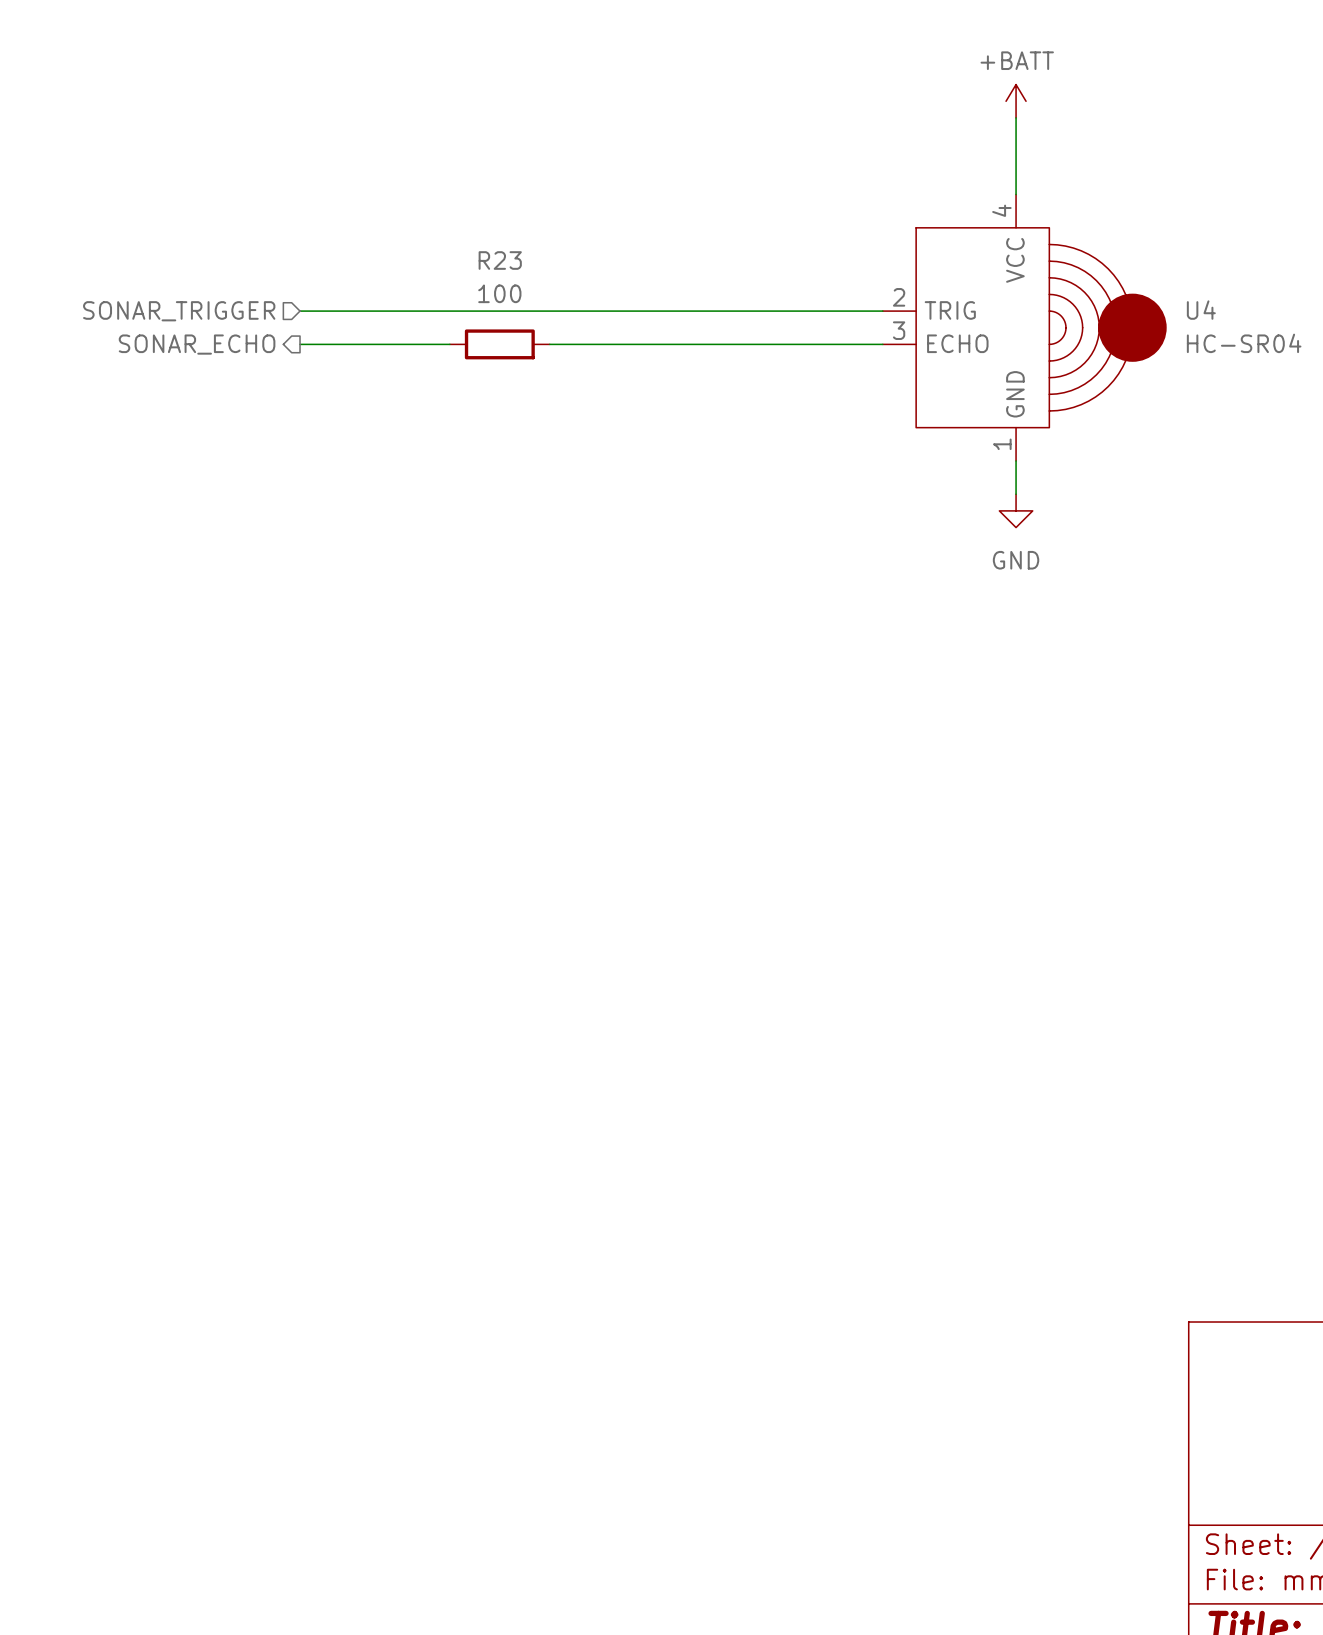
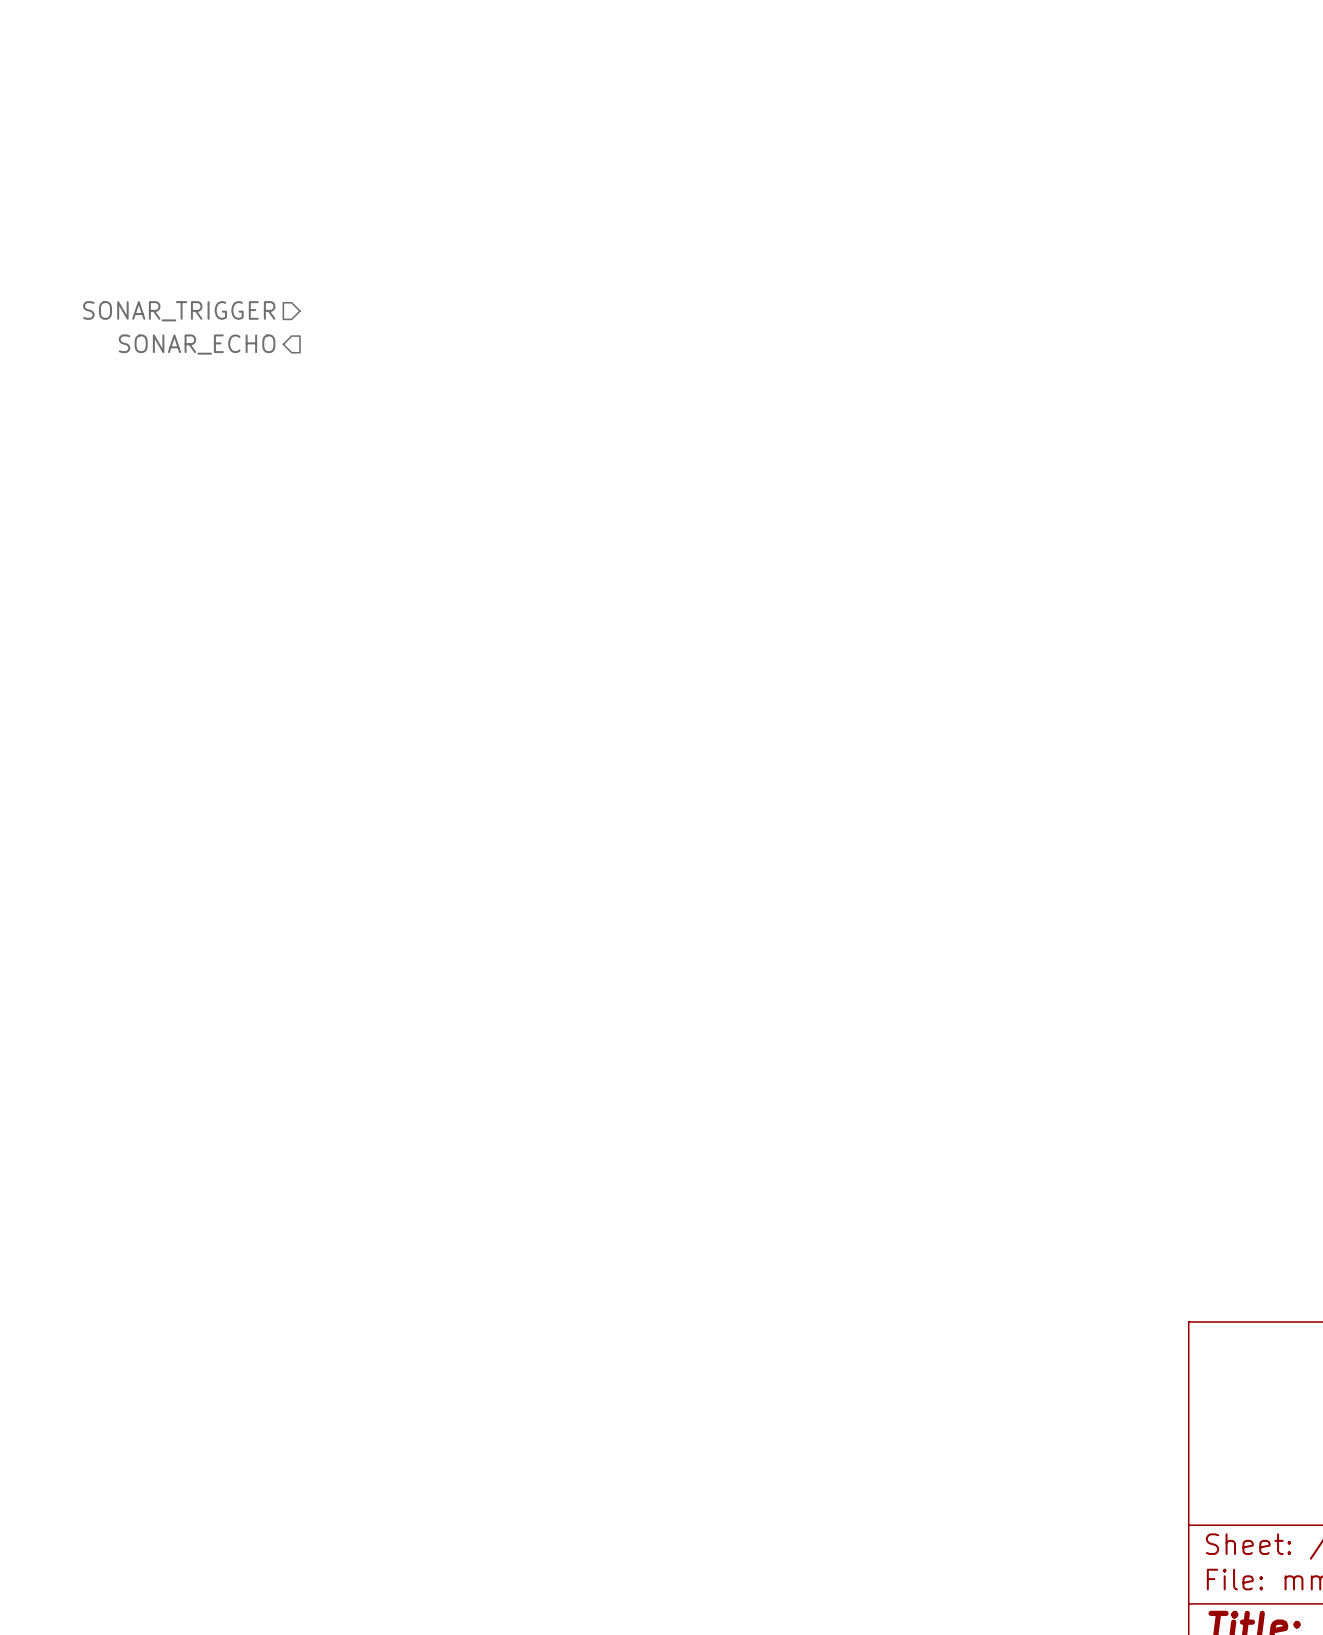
power symbol: +BATT (1016, 101) -> none
wire: (1016, 117) (1016, 194) -> none
wire: (300, 311) (882, 311) -> none
U4: HC-SR04 (1024, 327) -> none
wire: (300, 344) (449, 344) -> none
R23: 100 (499, 344) -> none
wire: (549, 344) (882, 344) -> none
wire: (1016, 460) (1016, 494) -> none
power symbol: GND (1016, 510) -> none

